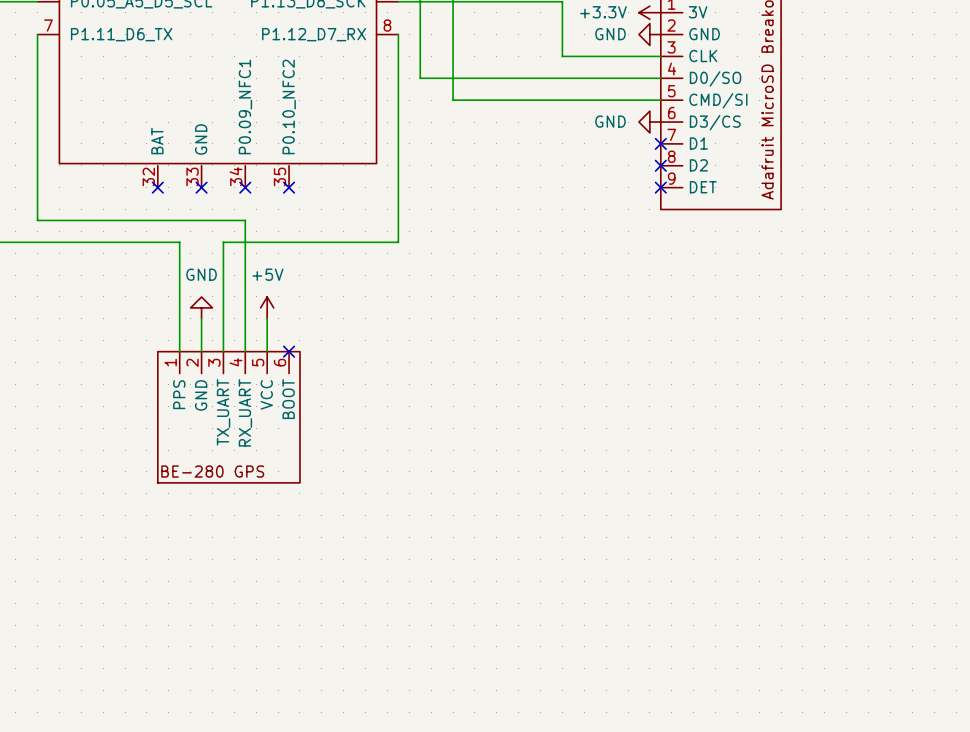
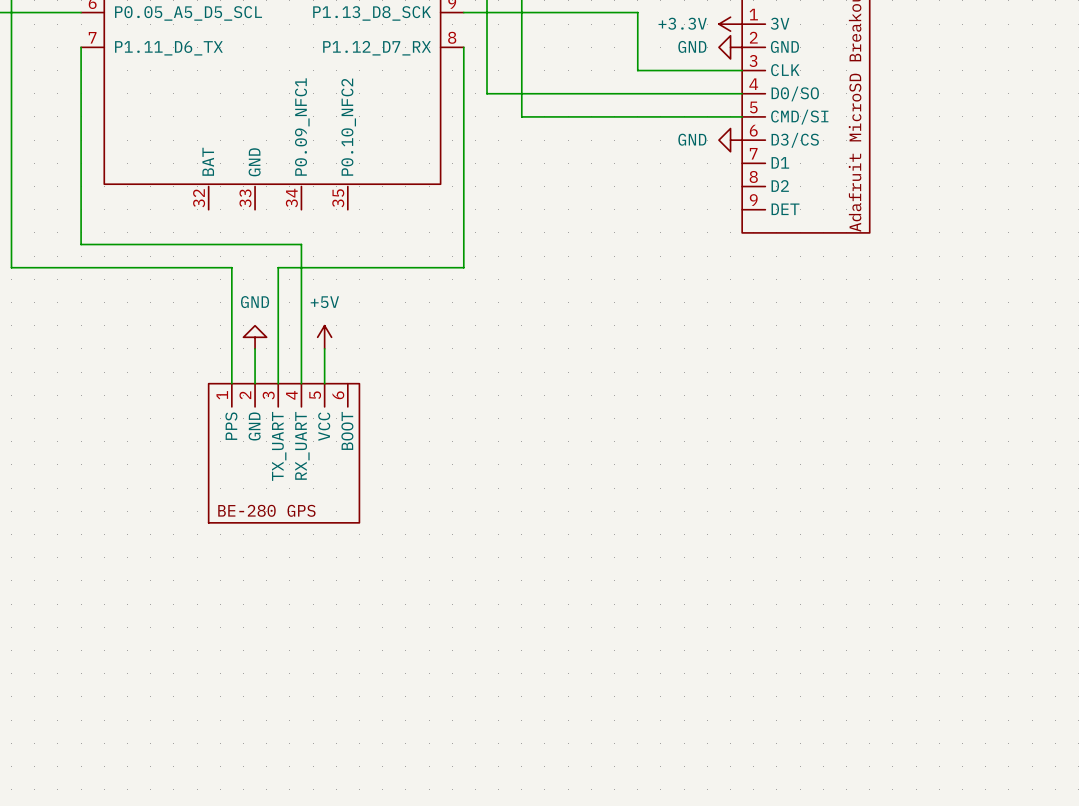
no-connect mark: (660, 143) -> none
no-connect mark: (660, 165) -> none
no-connect mark: (157, 187) -> none
no-connect mark: (201, 187) -> none
no-connect mark: (245, 187) -> none
no-connect mark: (289, 187) -> none
no-connect mark: (660, 187) -> none
no-connect mark: (289, 351) -> none

